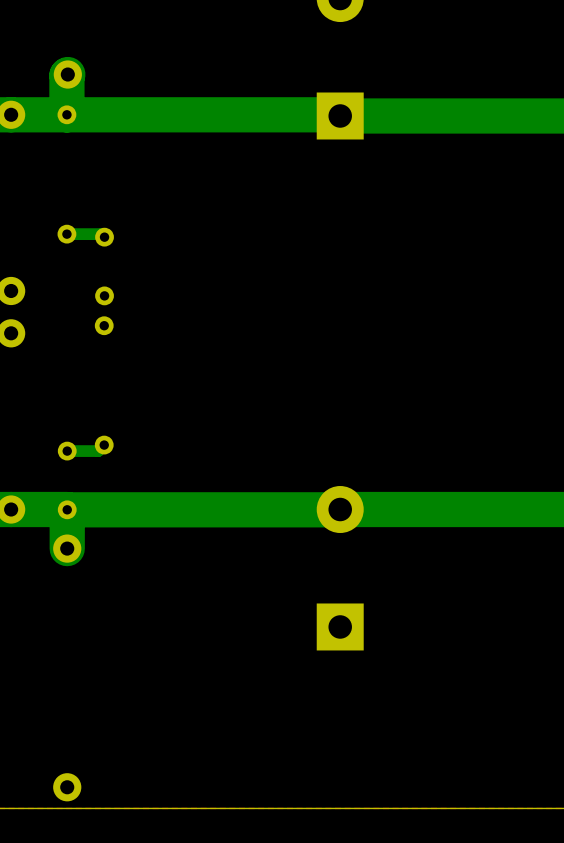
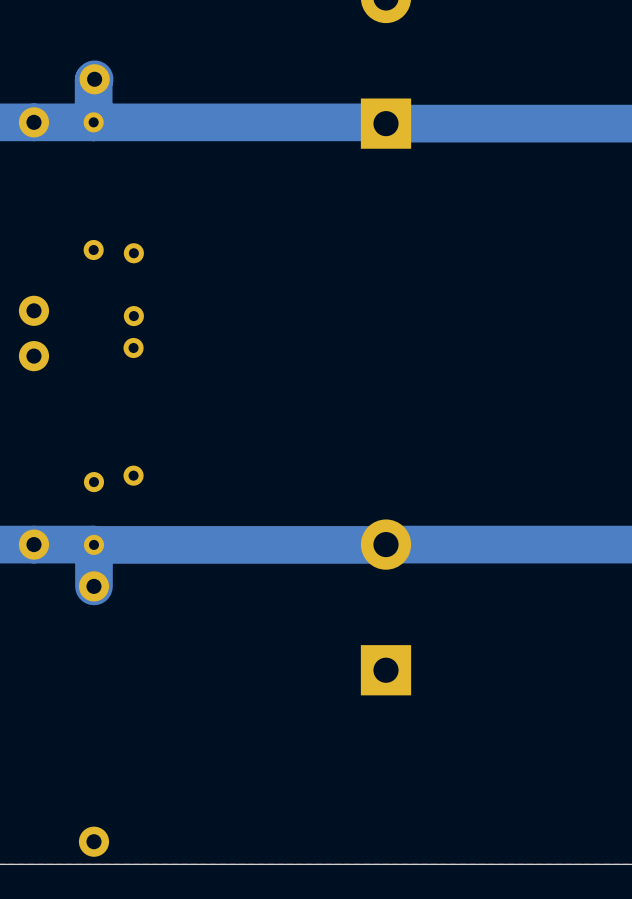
bottom track: (66, 234) (101, 234) (104, 237) -> none
bottom track: (104, 445) (98, 451) (67, 451) -> none

